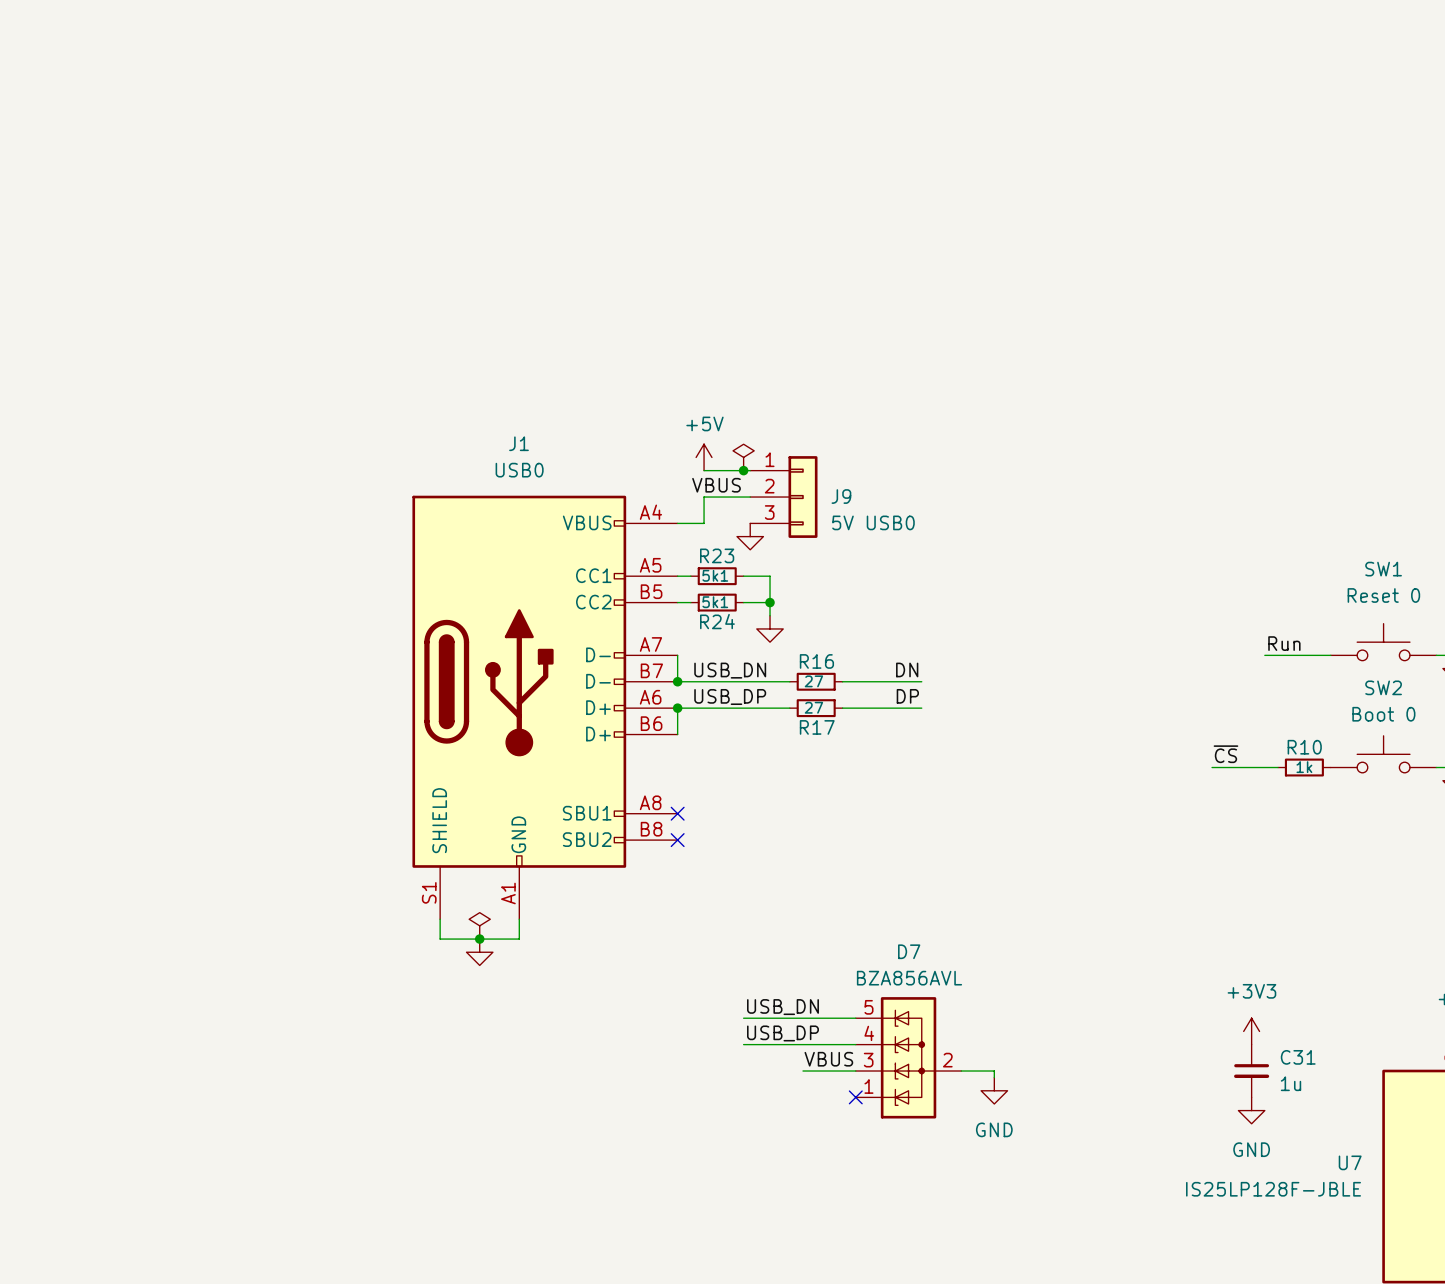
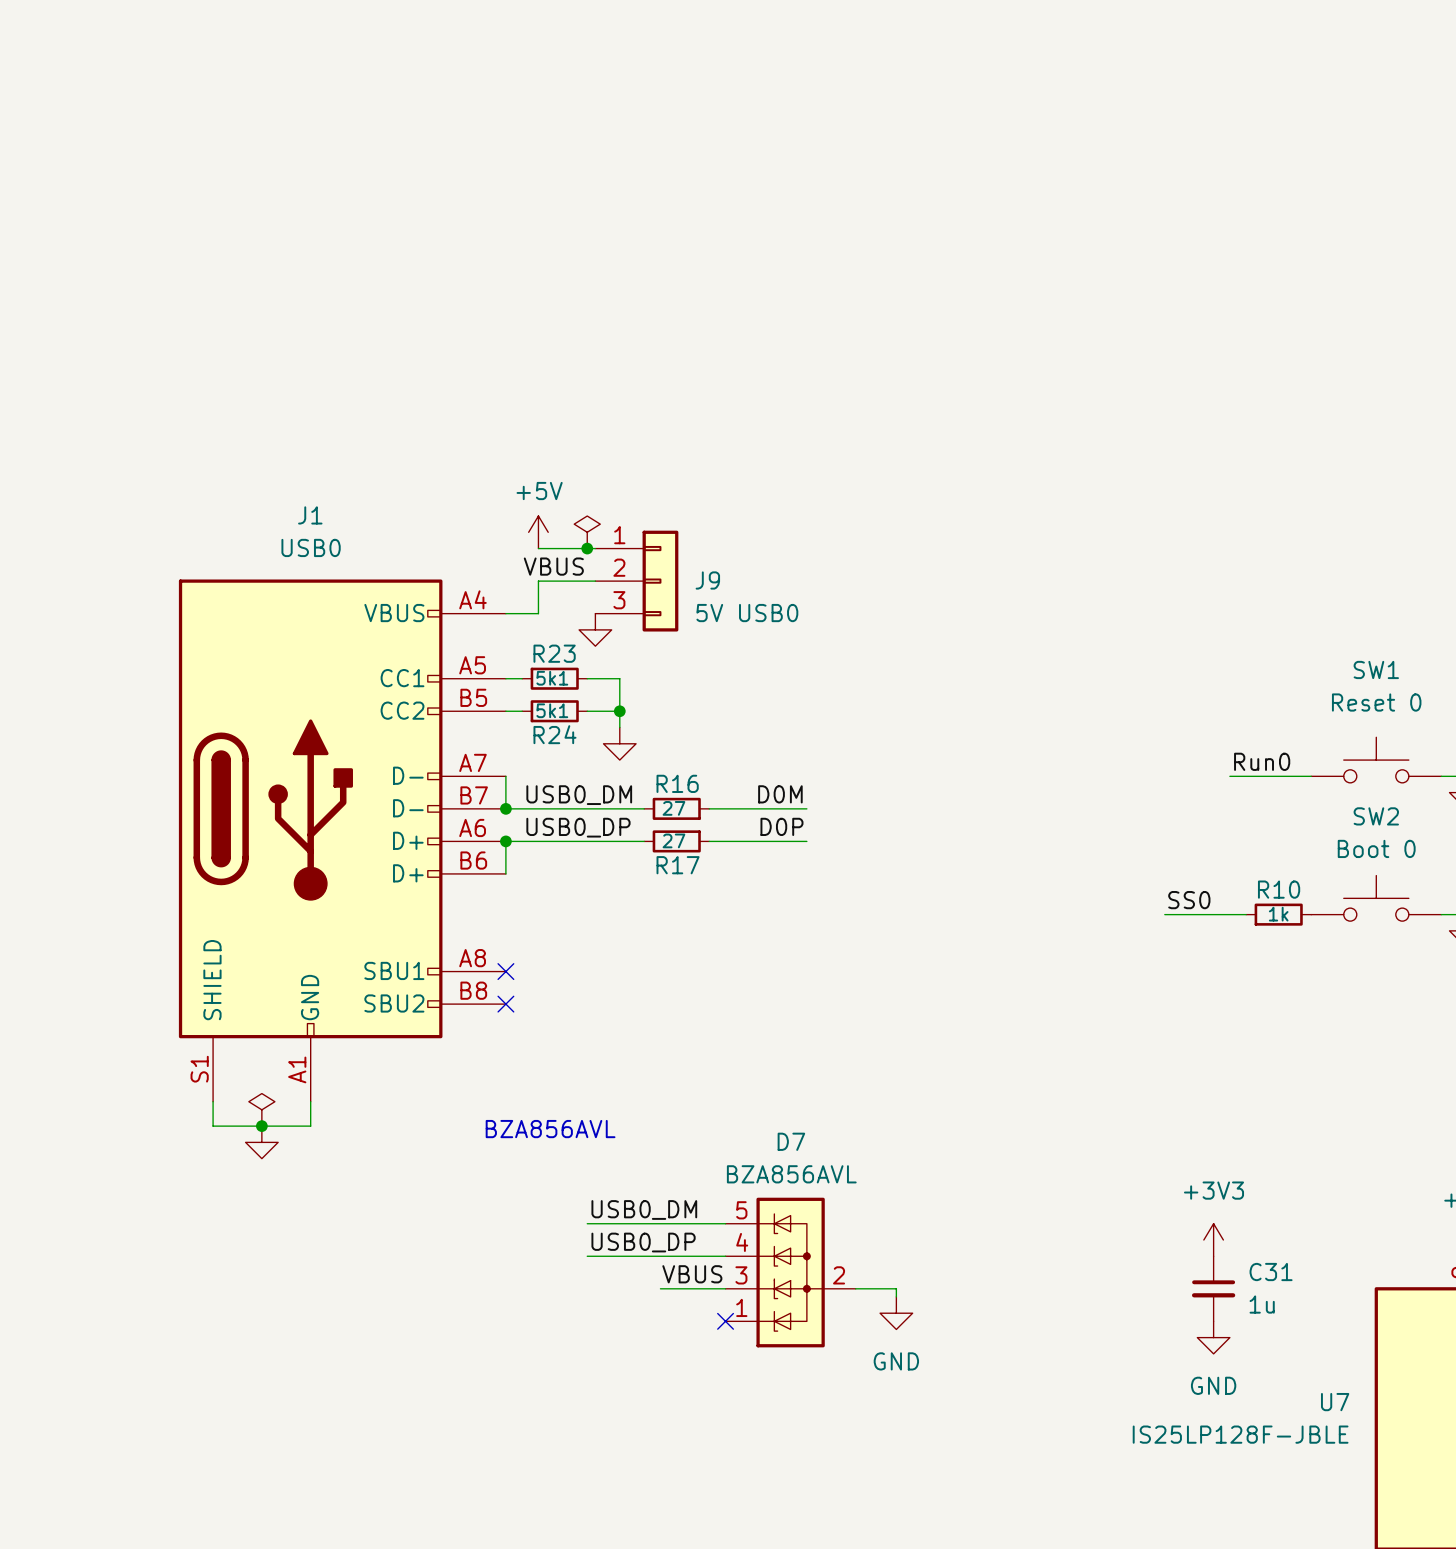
label: Run (1284, 643) -> Run0 (1262, 761)
label: DN (907, 669) -> D0M (780, 794)
label: USB_DN (730, 670) -> USB0_DM (579, 795)
label: USB_DP (730, 696) -> USB0_DP (578, 827)
label: DP (907, 696) -> D0P (781, 826)
label: ~{CS} (1225, 754) -> SS0 (1189, 900)
text: none -> BZA856AVL (550, 1129)
label: USB_DN (782, 1007) -> USB0_DM (644, 1209)
label: USB_DP (782, 1033) -> USB0_DP (643, 1242)

